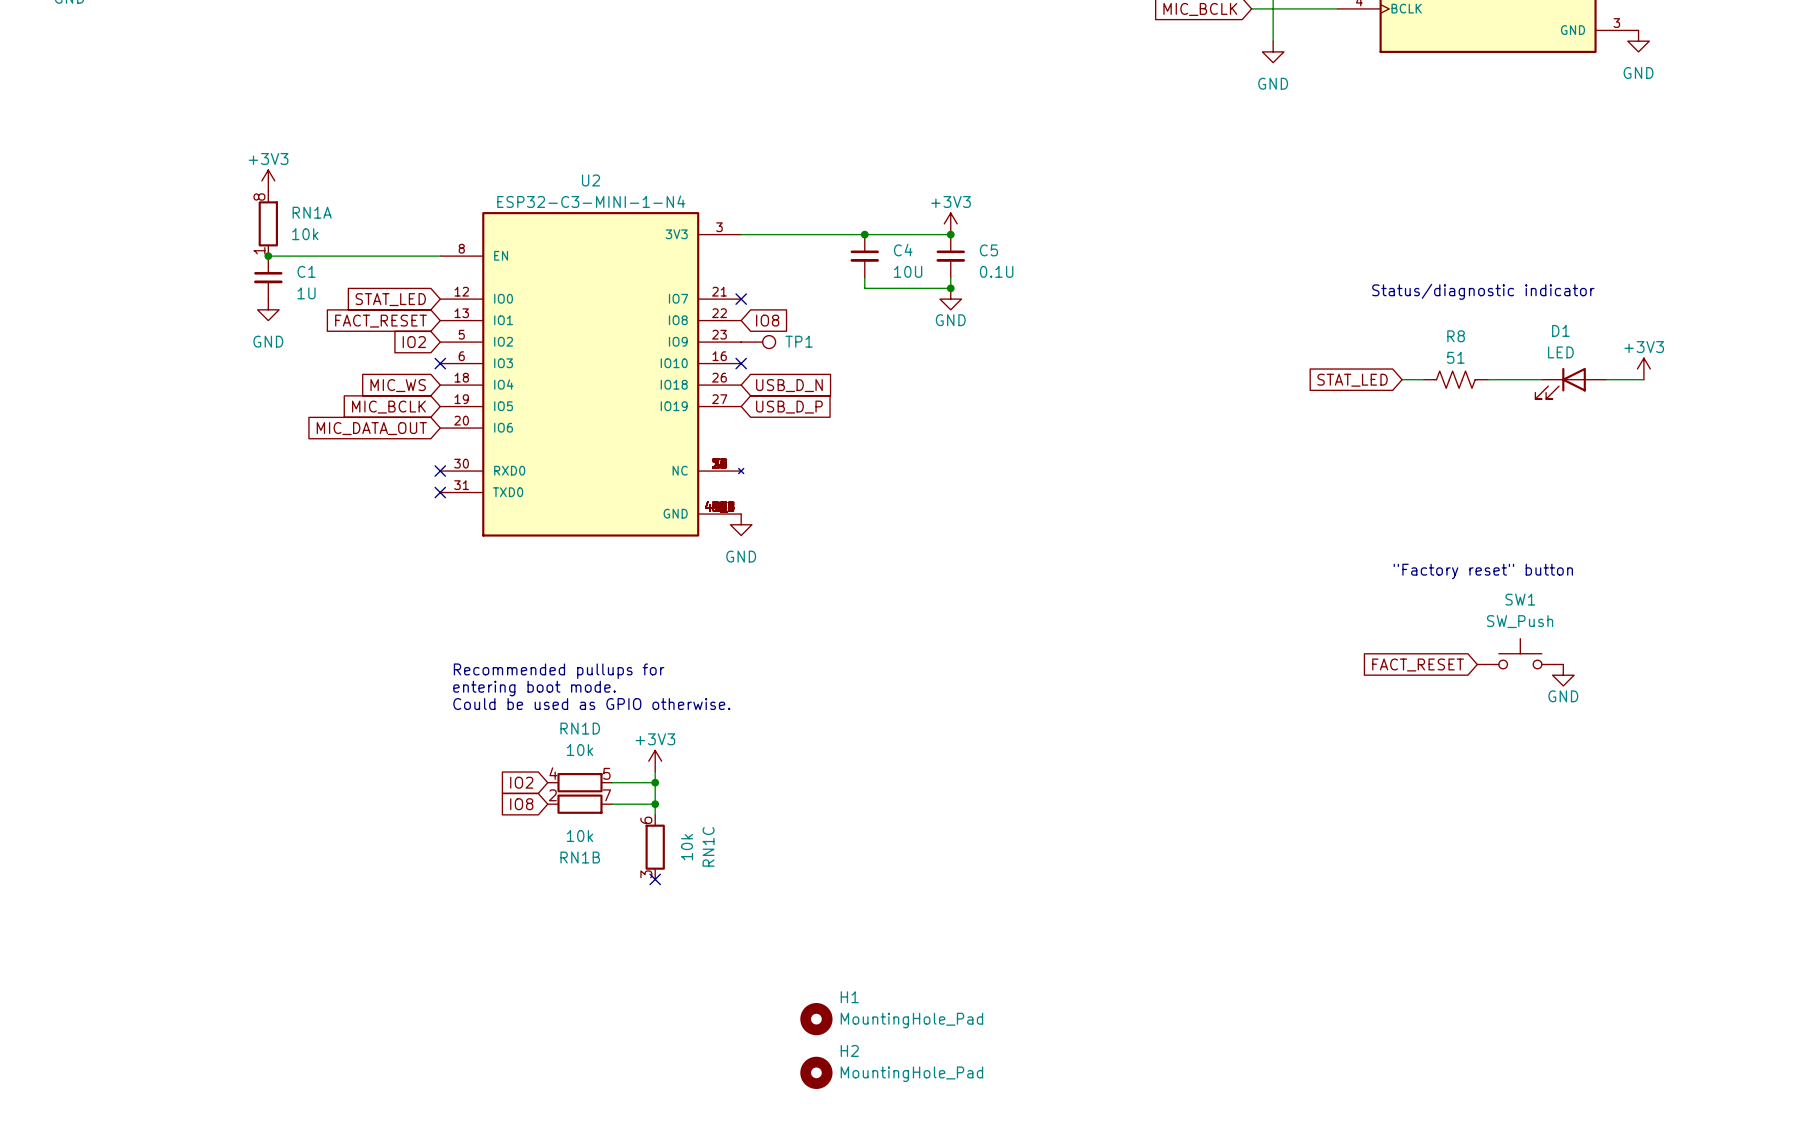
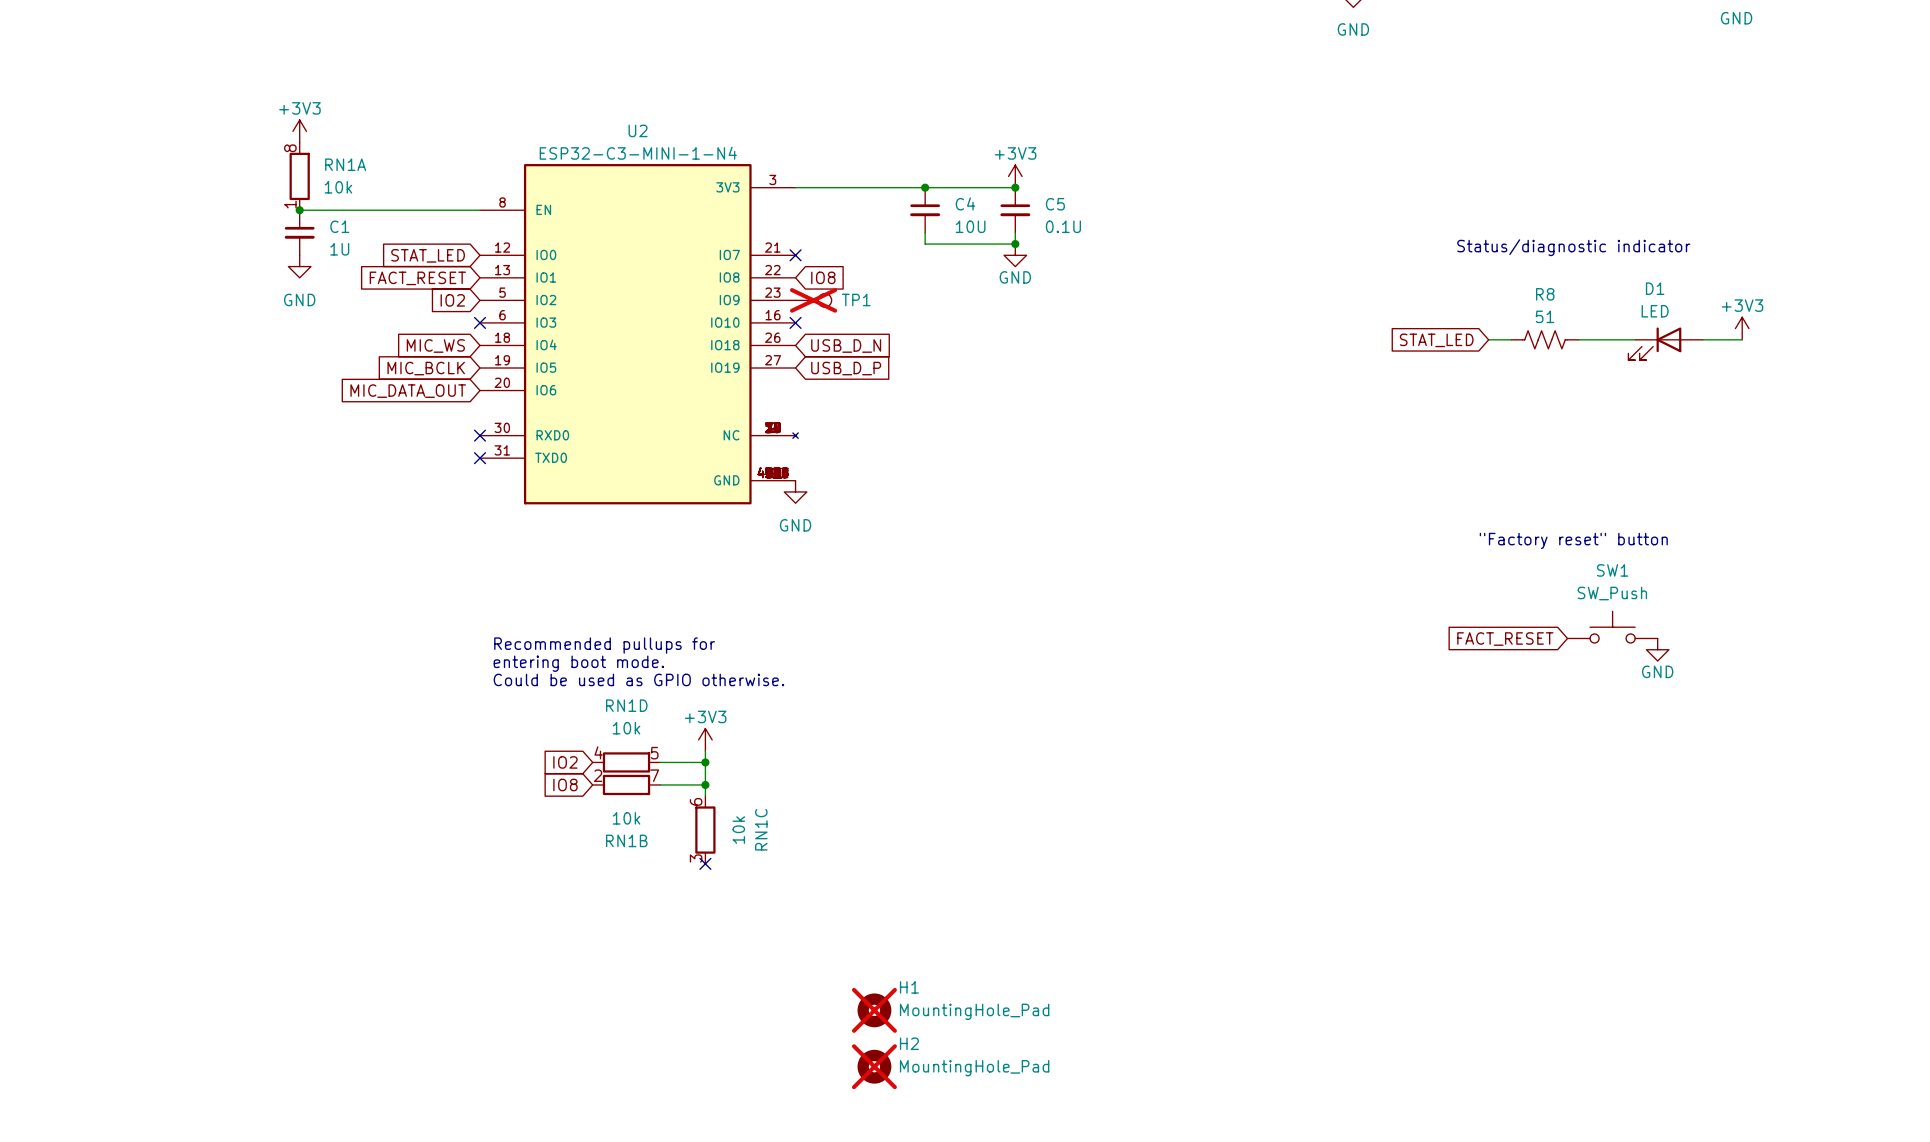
TP1 do-not-place cross: none -> (813, 300)
H1 do-not-place cross: none -> (874, 1010)
H2 do-not-place cross: none -> (874, 1066)

